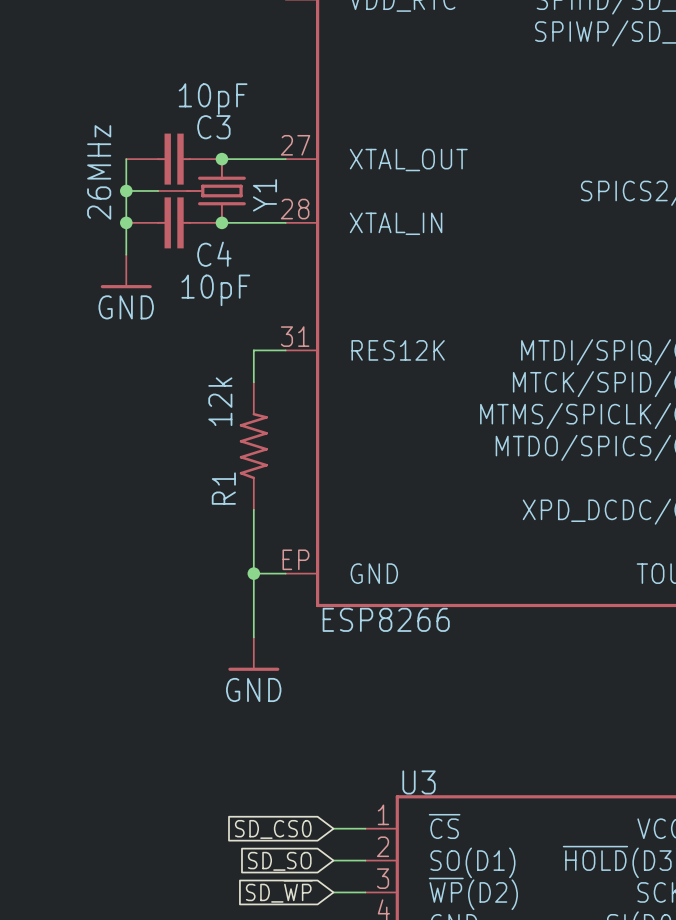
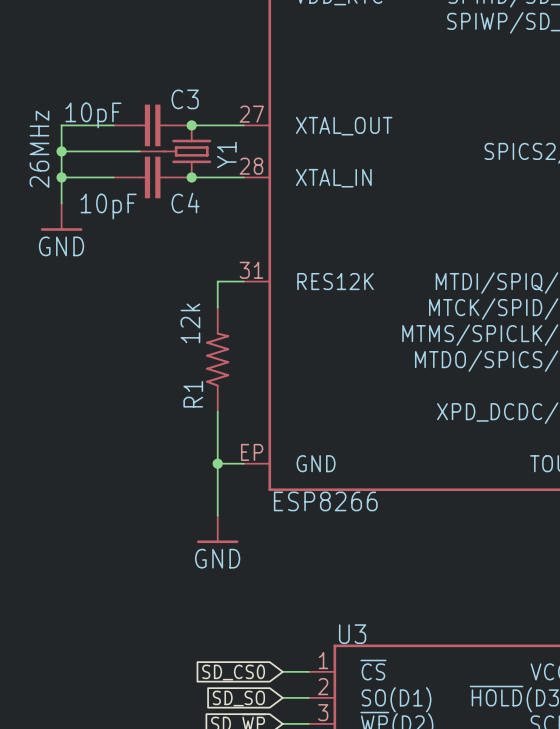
C3 value position: 10pF (213, 99) -> 10pF (93, 115)
wire: (126, 159) (126, 254) -> (113, 125) (61, 125) (61, 203)
Y1 value position: 26MHz (99, 172) -> 26MHz (39, 149)
wire: none -> (61, 151) (113, 151)
junction: none -> (61, 151)
junction: (126, 190) -> none
wire: none -> (61, 177) (113, 177)
junction: none -> (61, 177)
junction: (126, 222) -> none
power symbol position: GND (126, 271) -> GND (61, 217)
C4 value position: 10pF (215, 290) -> 10pF (108, 206)

